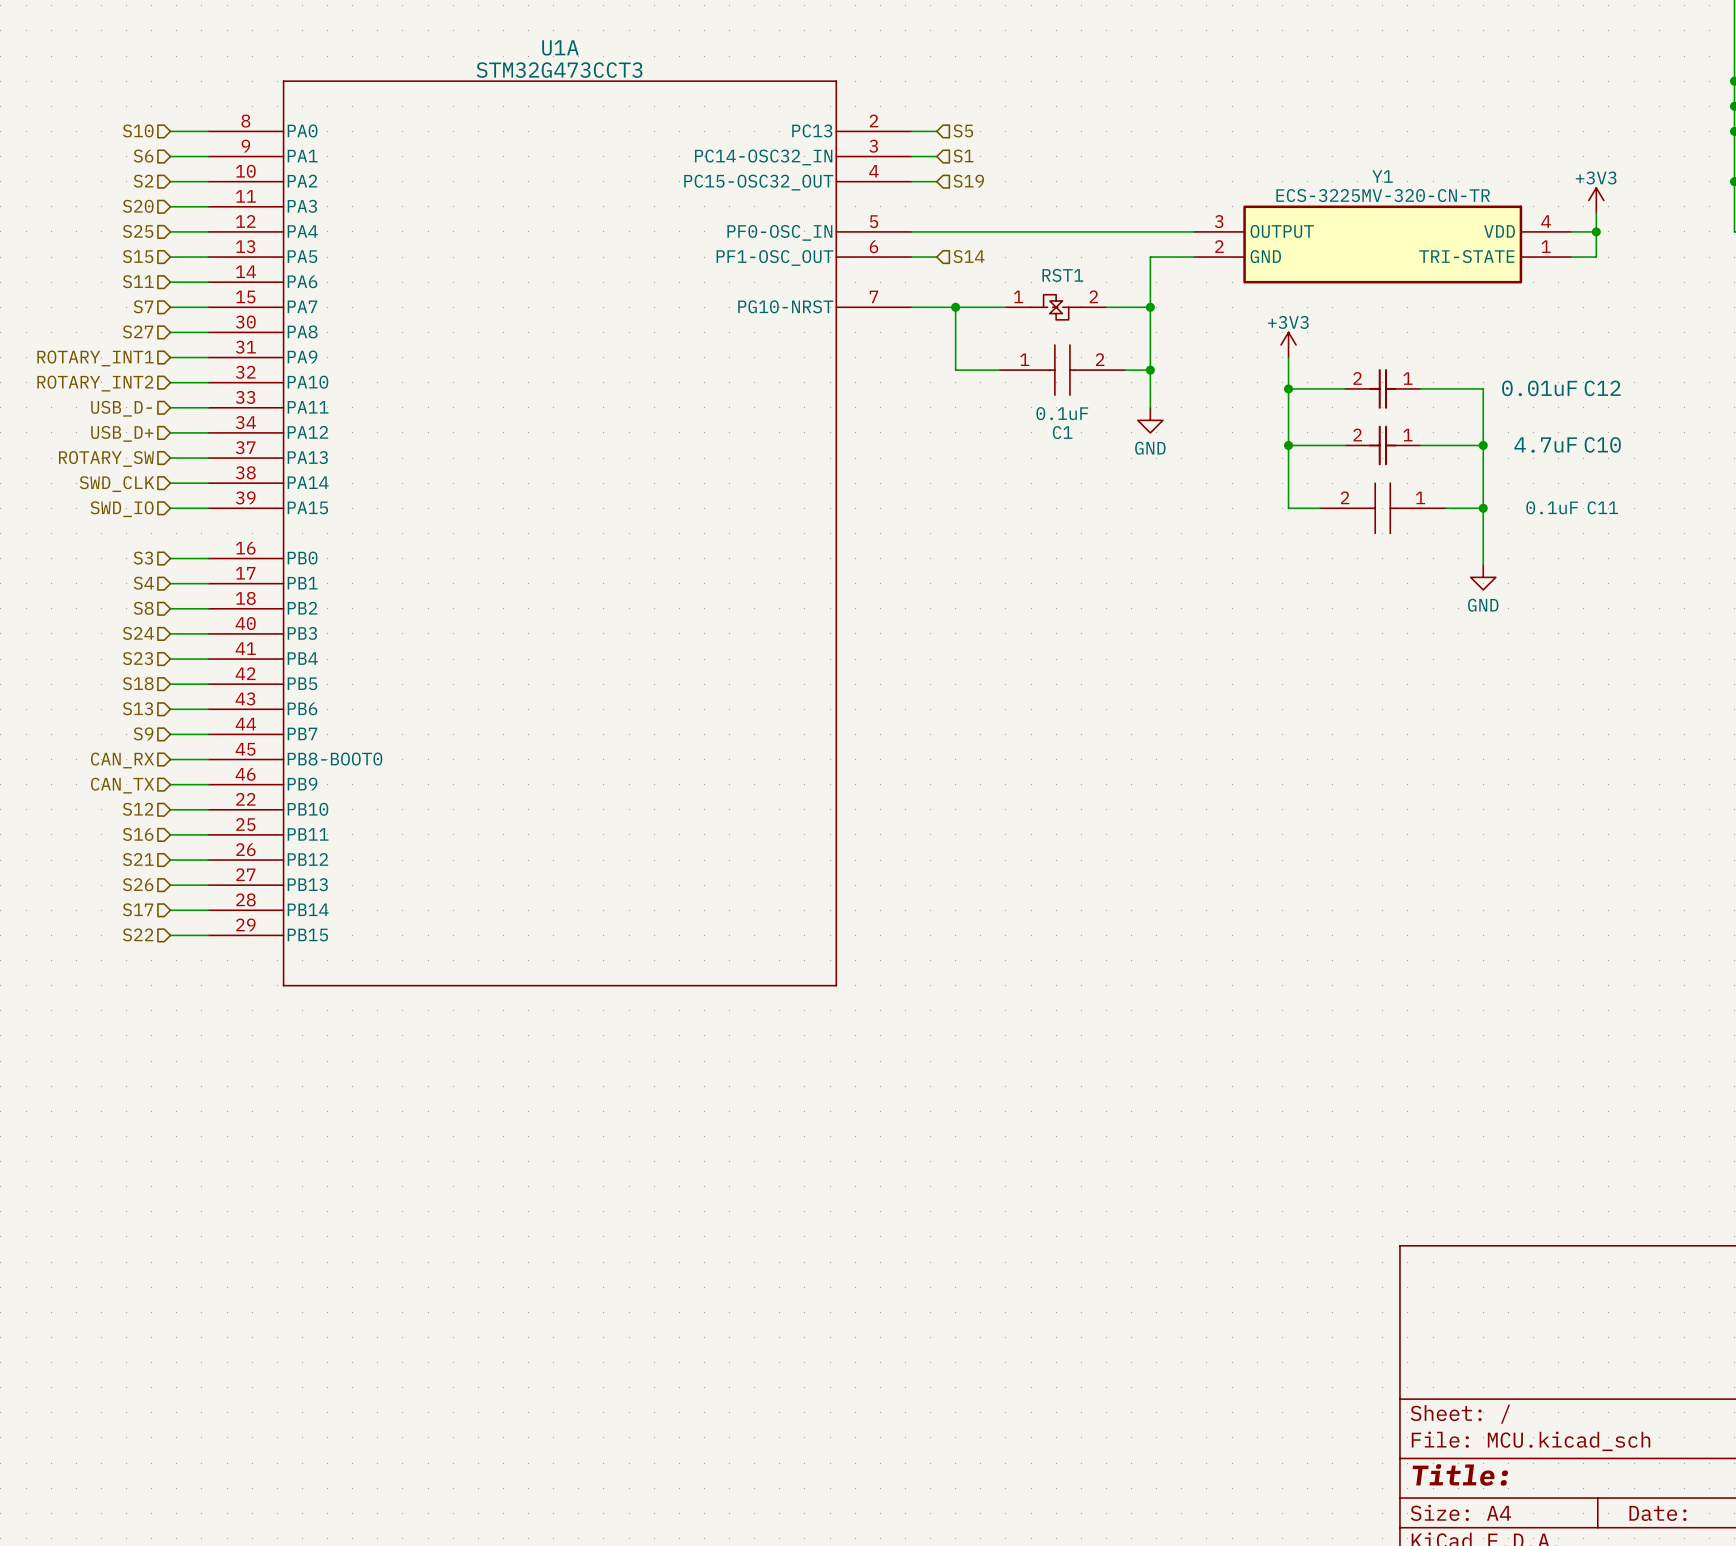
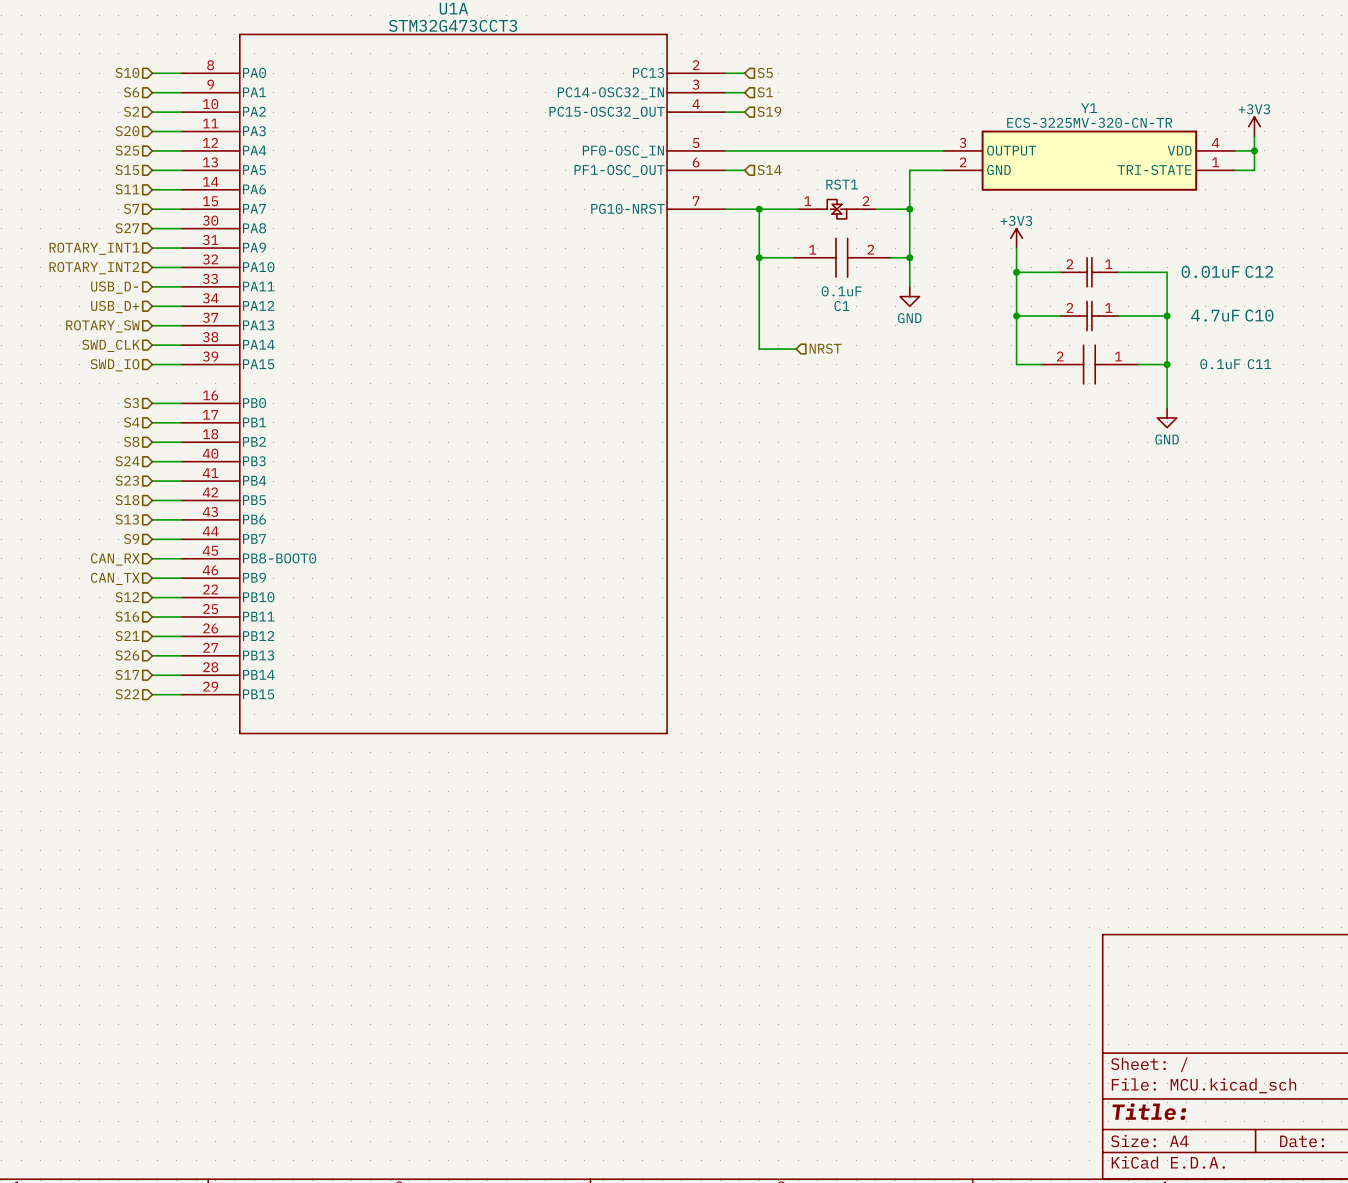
wire: none -> (759, 257) (759, 349) (796, 349)
junction: none -> (759, 257)
hierarchical label: none -> NRST (825, 348)

